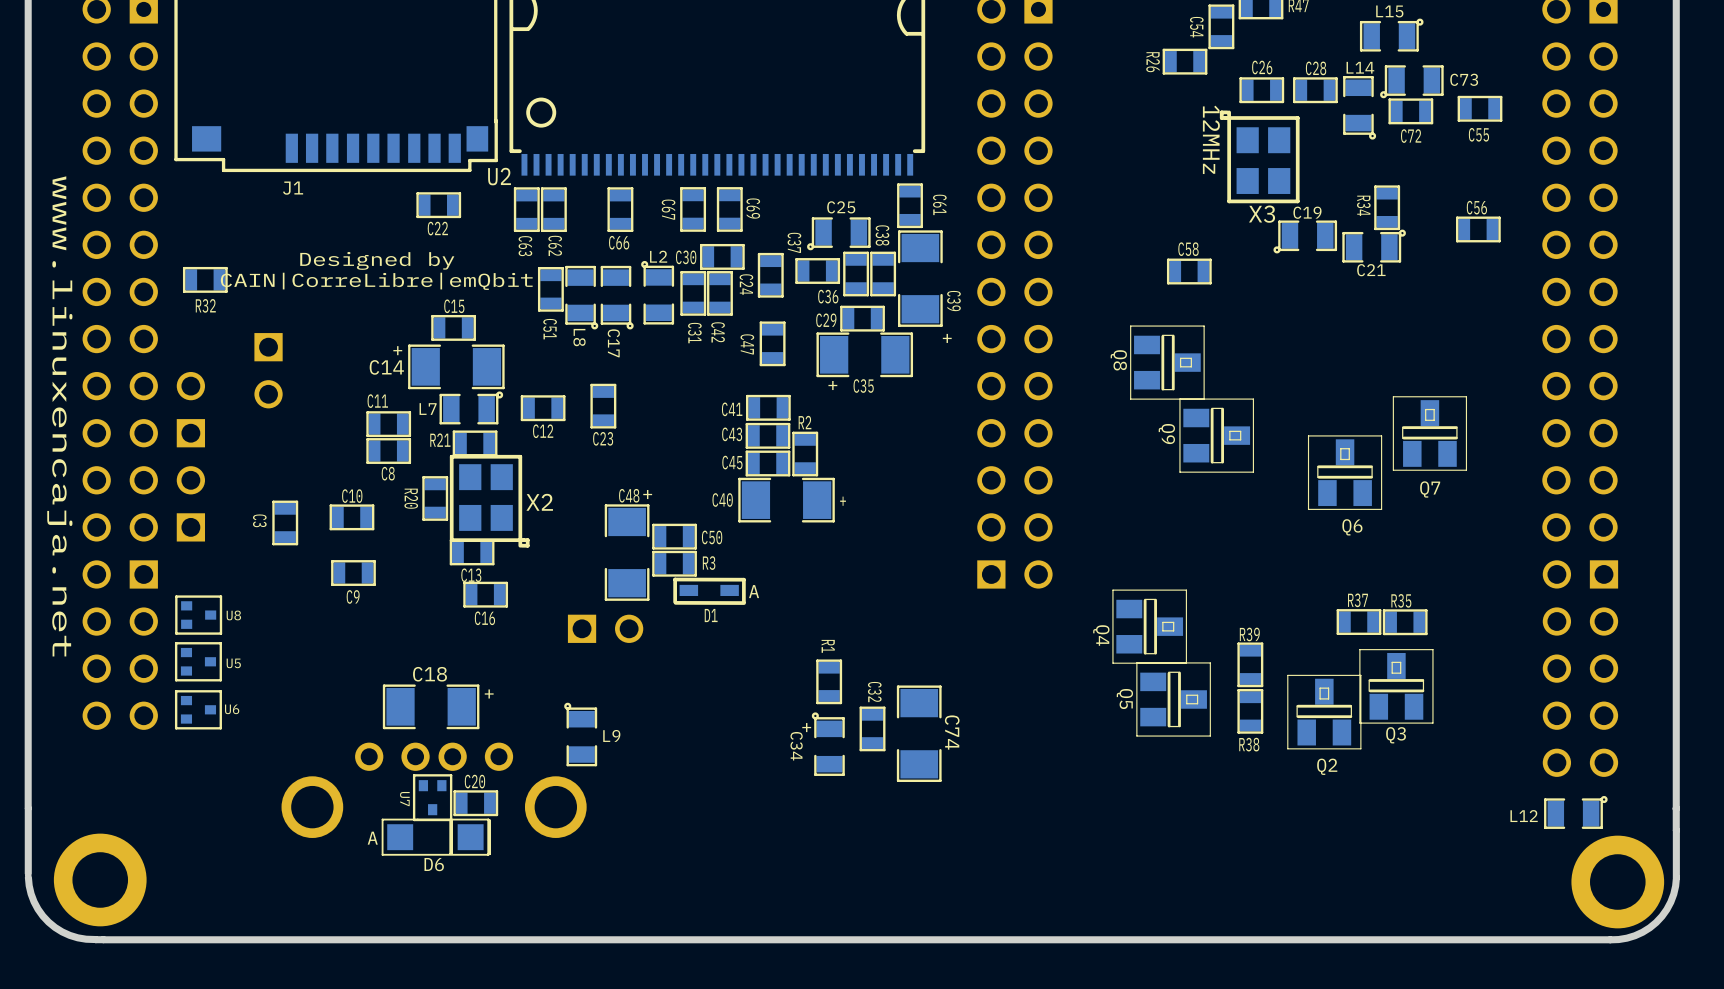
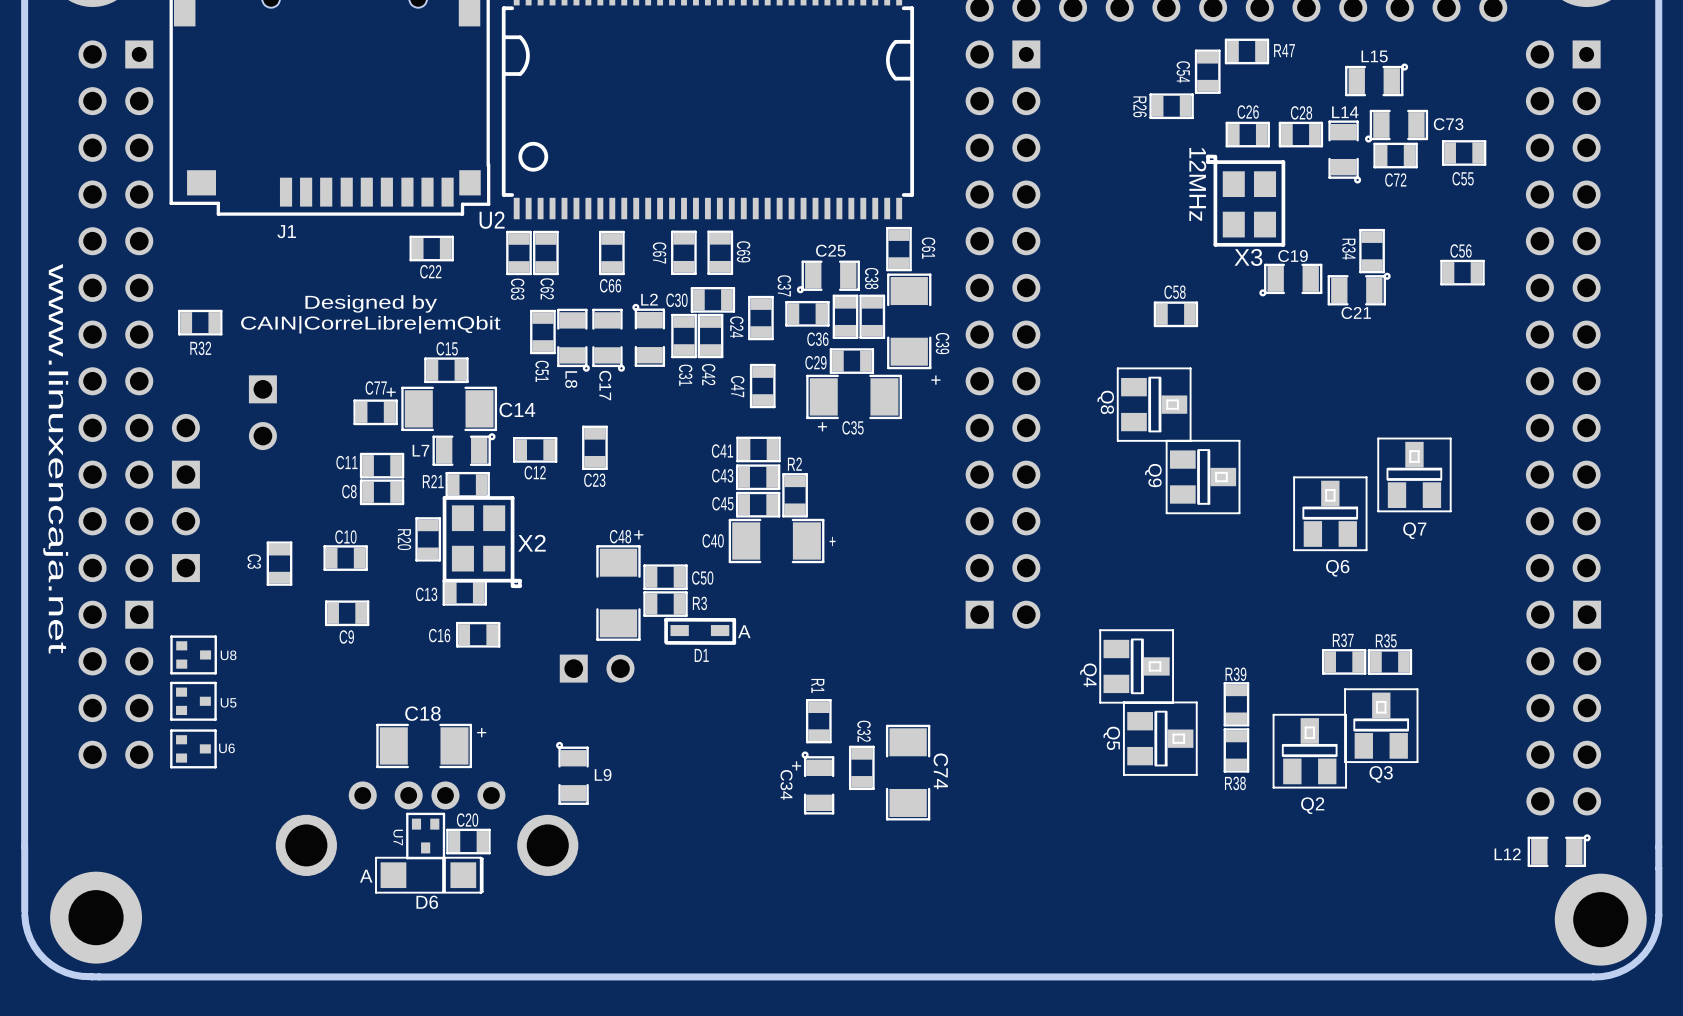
C14 name position: C14 (386, 367) -> C14 (517, 409)
C77: none -> (375, 412)
C11 name position: C11 (377, 401) -> C11 (346, 462)
C8 name position: C8 (388, 473) -> C8 (349, 491)
C13 name position: C13 (471, 575) -> C13 (426, 594)
C16 name position: C16 (484, 618) -> C16 (439, 635)

